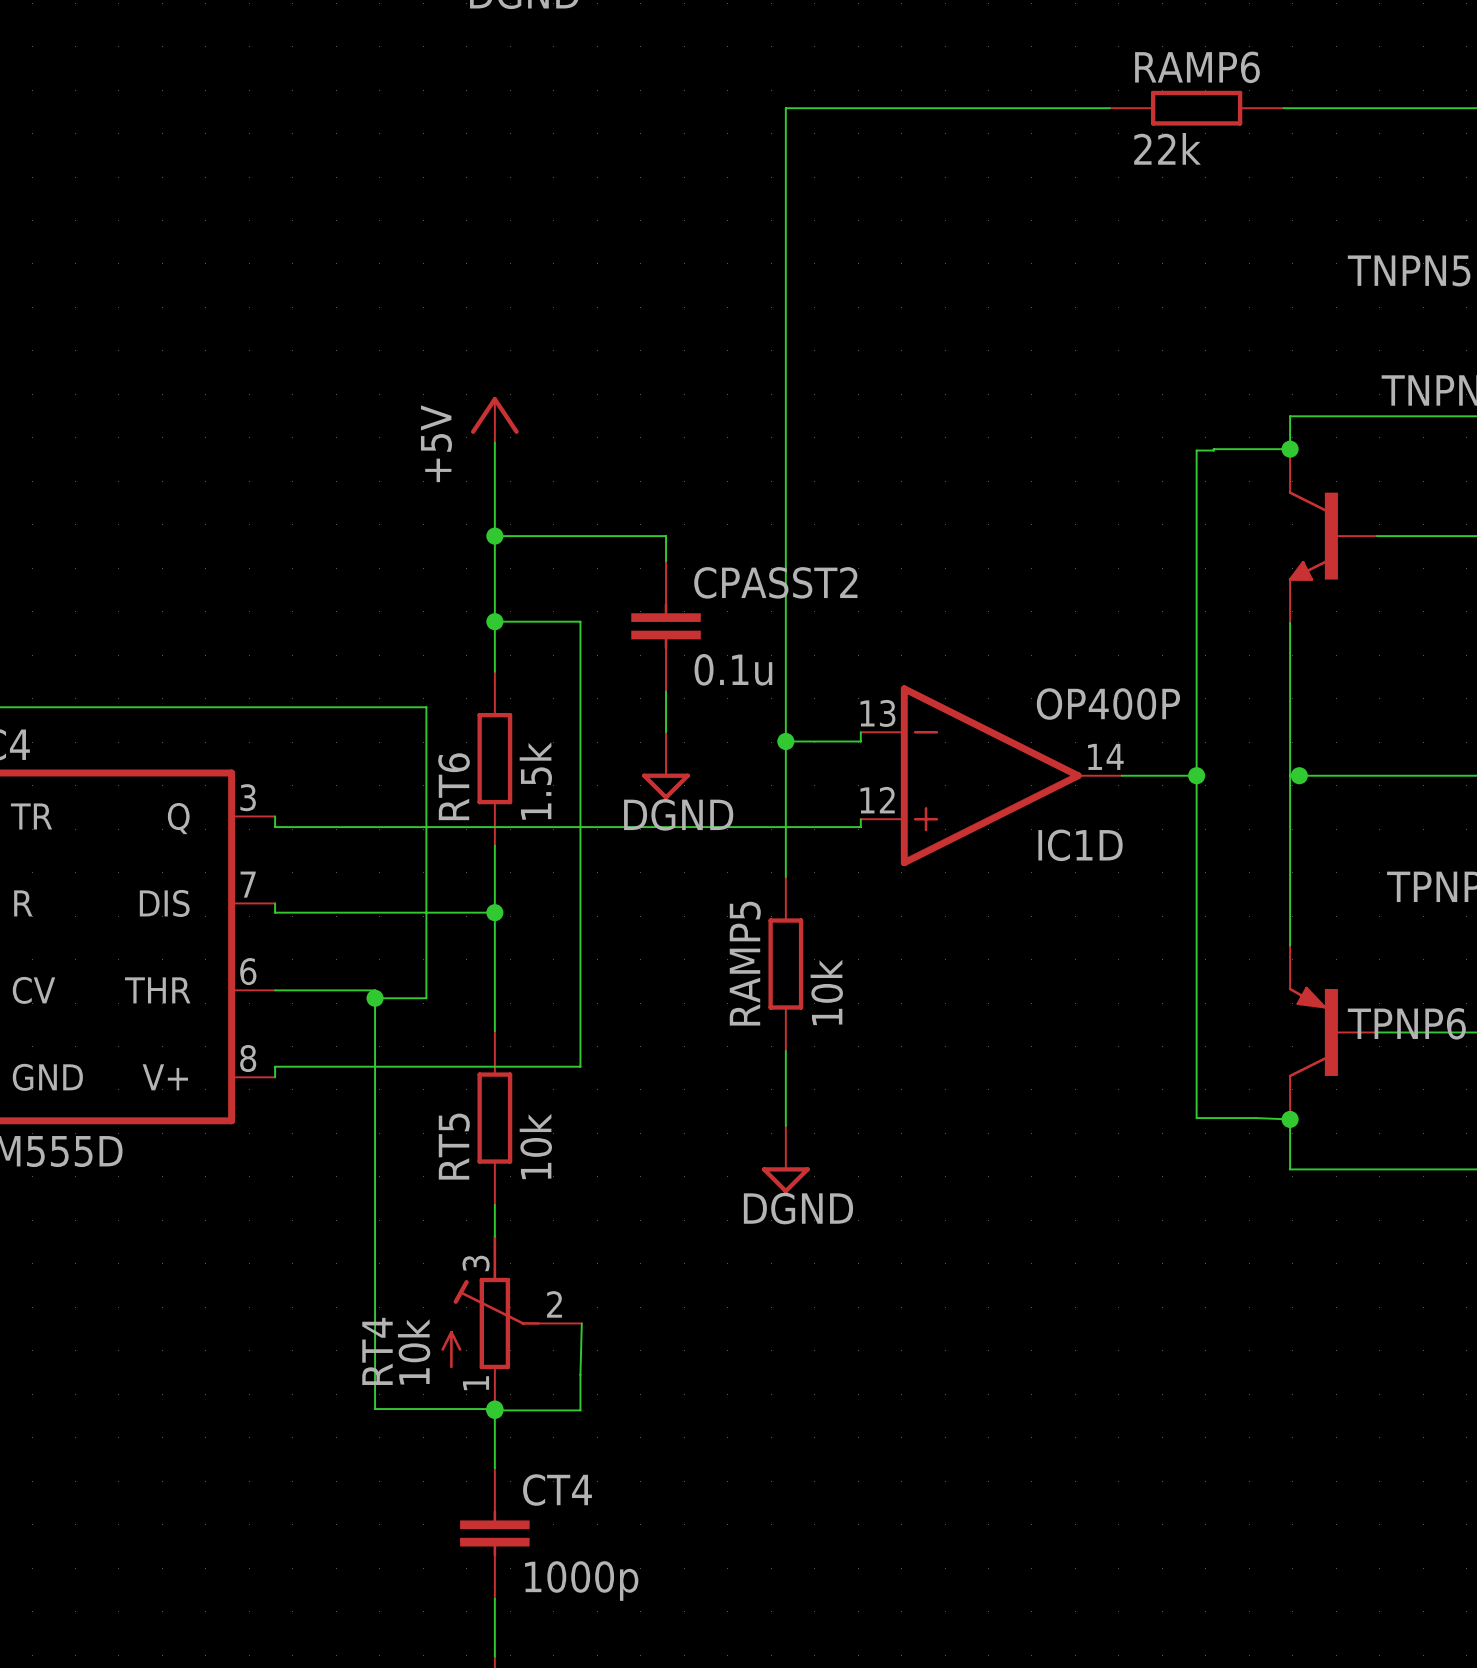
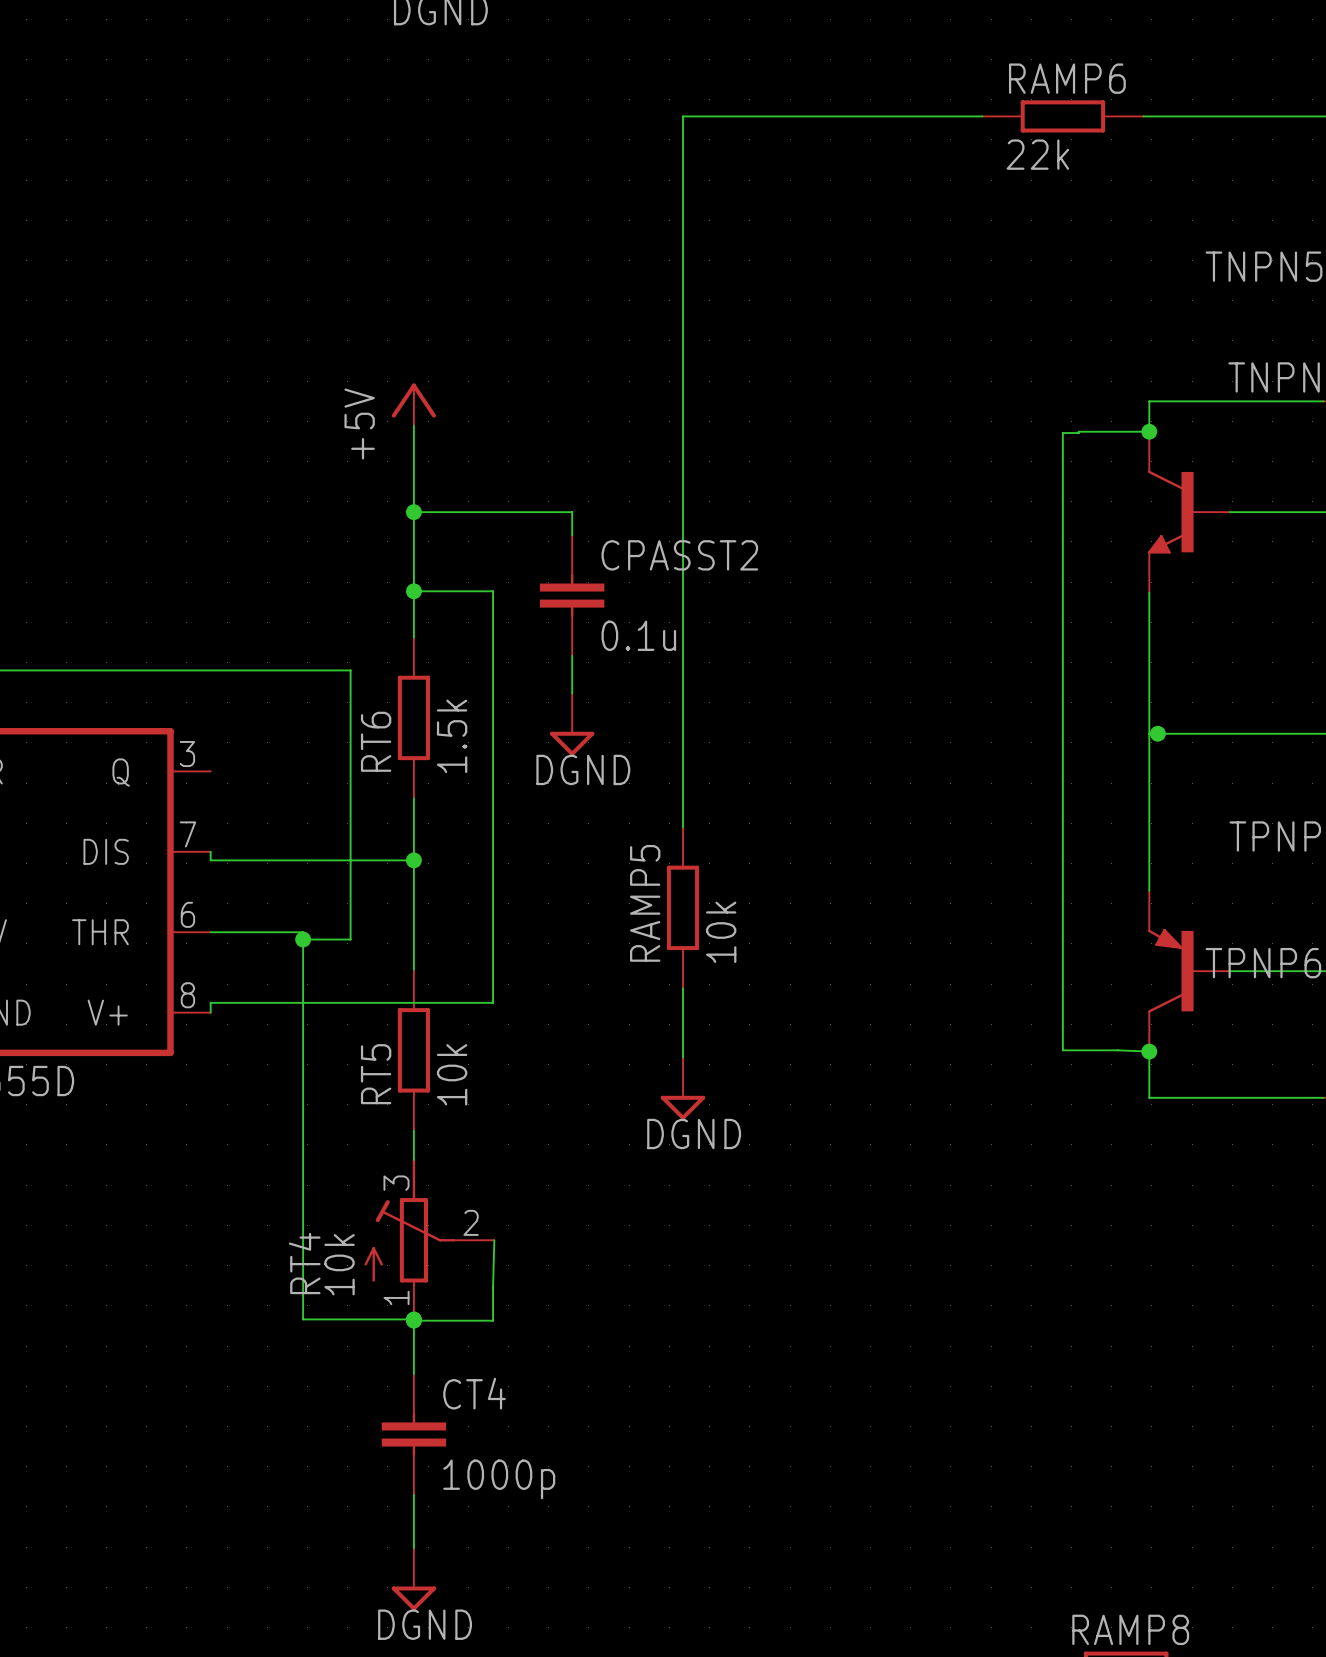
wire: (860, 732) (860, 741) (785, 741) -> none
junction: (785, 741) -> none
IC1D: OP400P (991, 775) -> none
wire: (1121, 775) (1196, 775) -> none
junction: (1196, 775) -> none
wire: (275, 816) (275, 827) (860, 827) (860, 819) -> none

